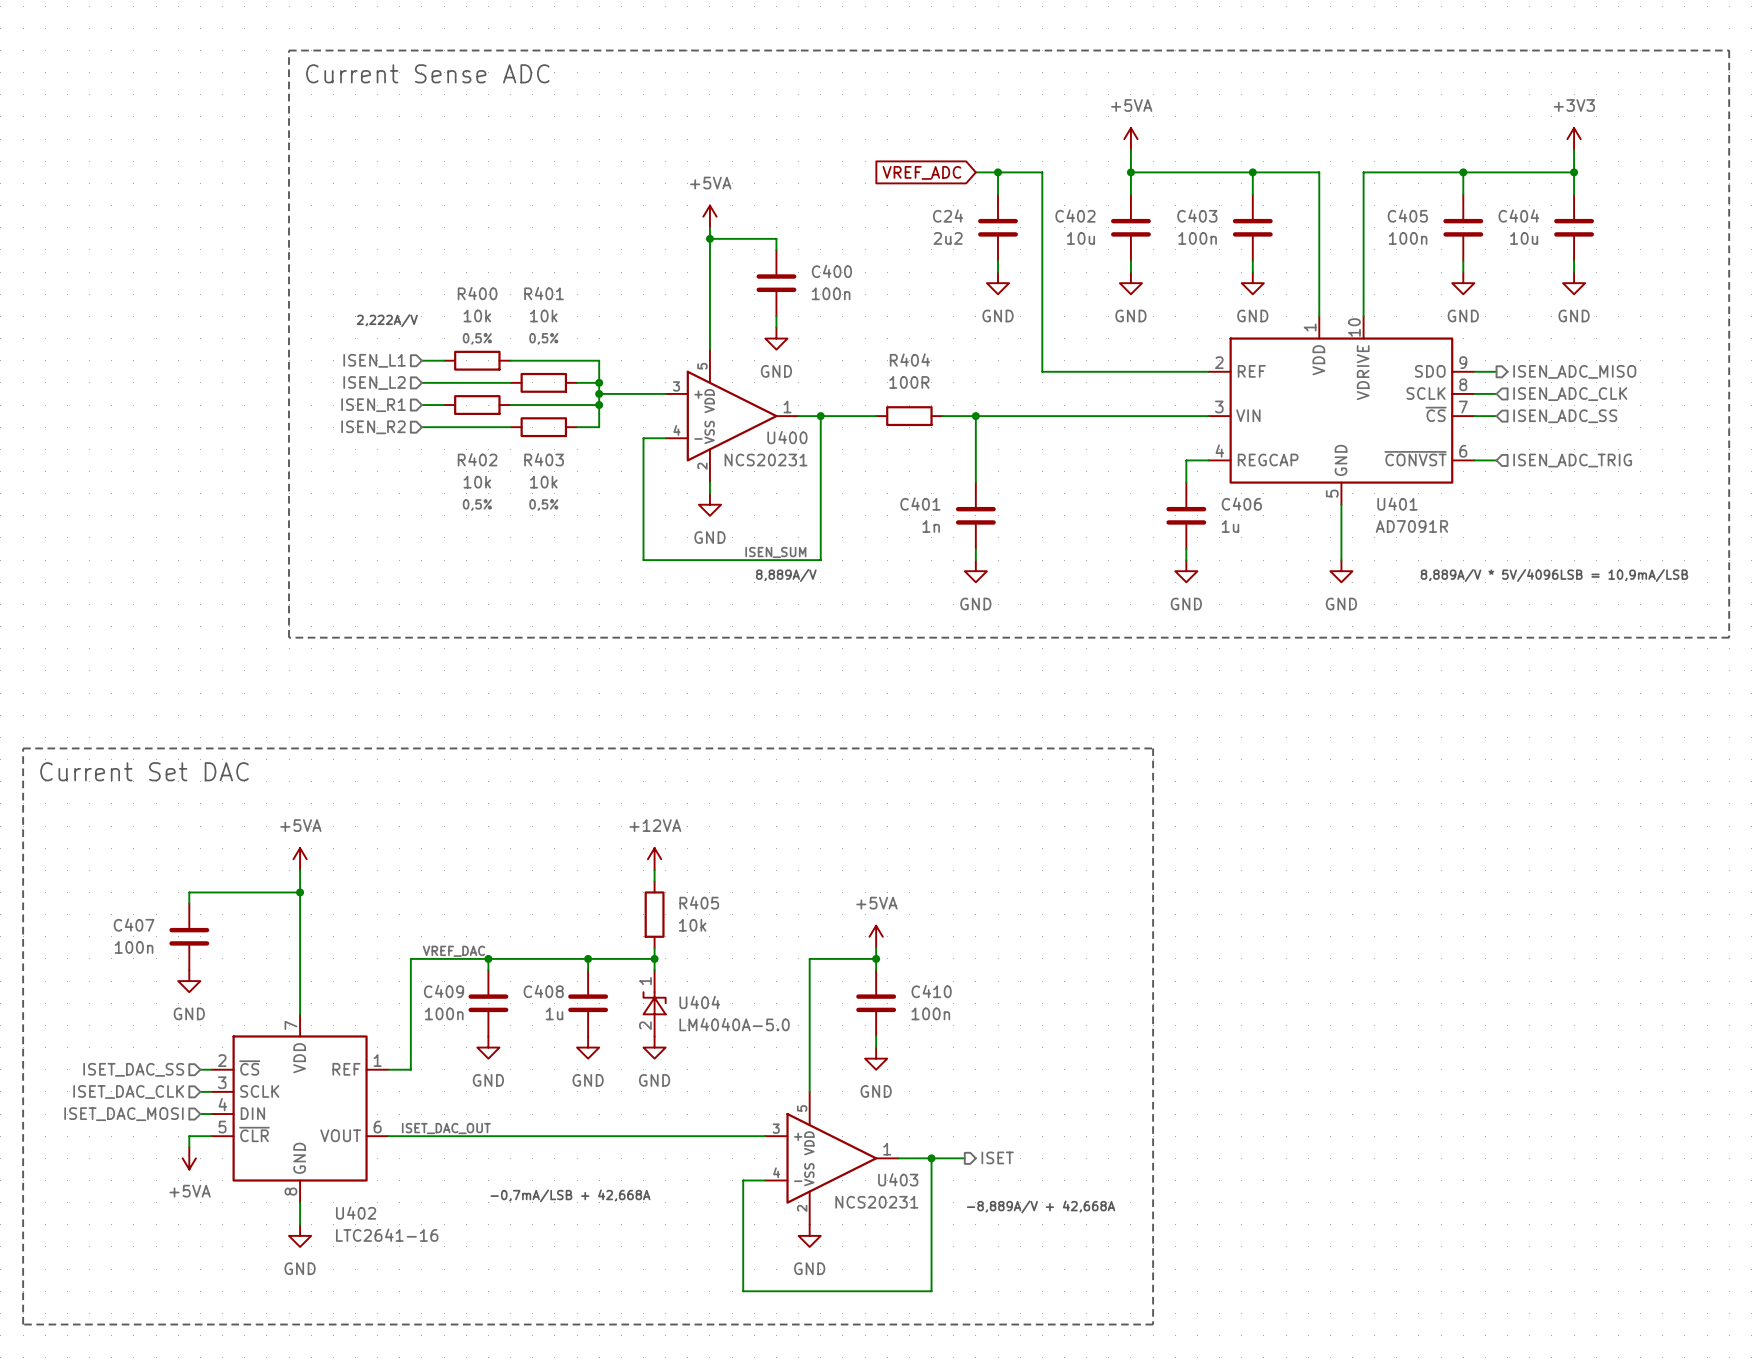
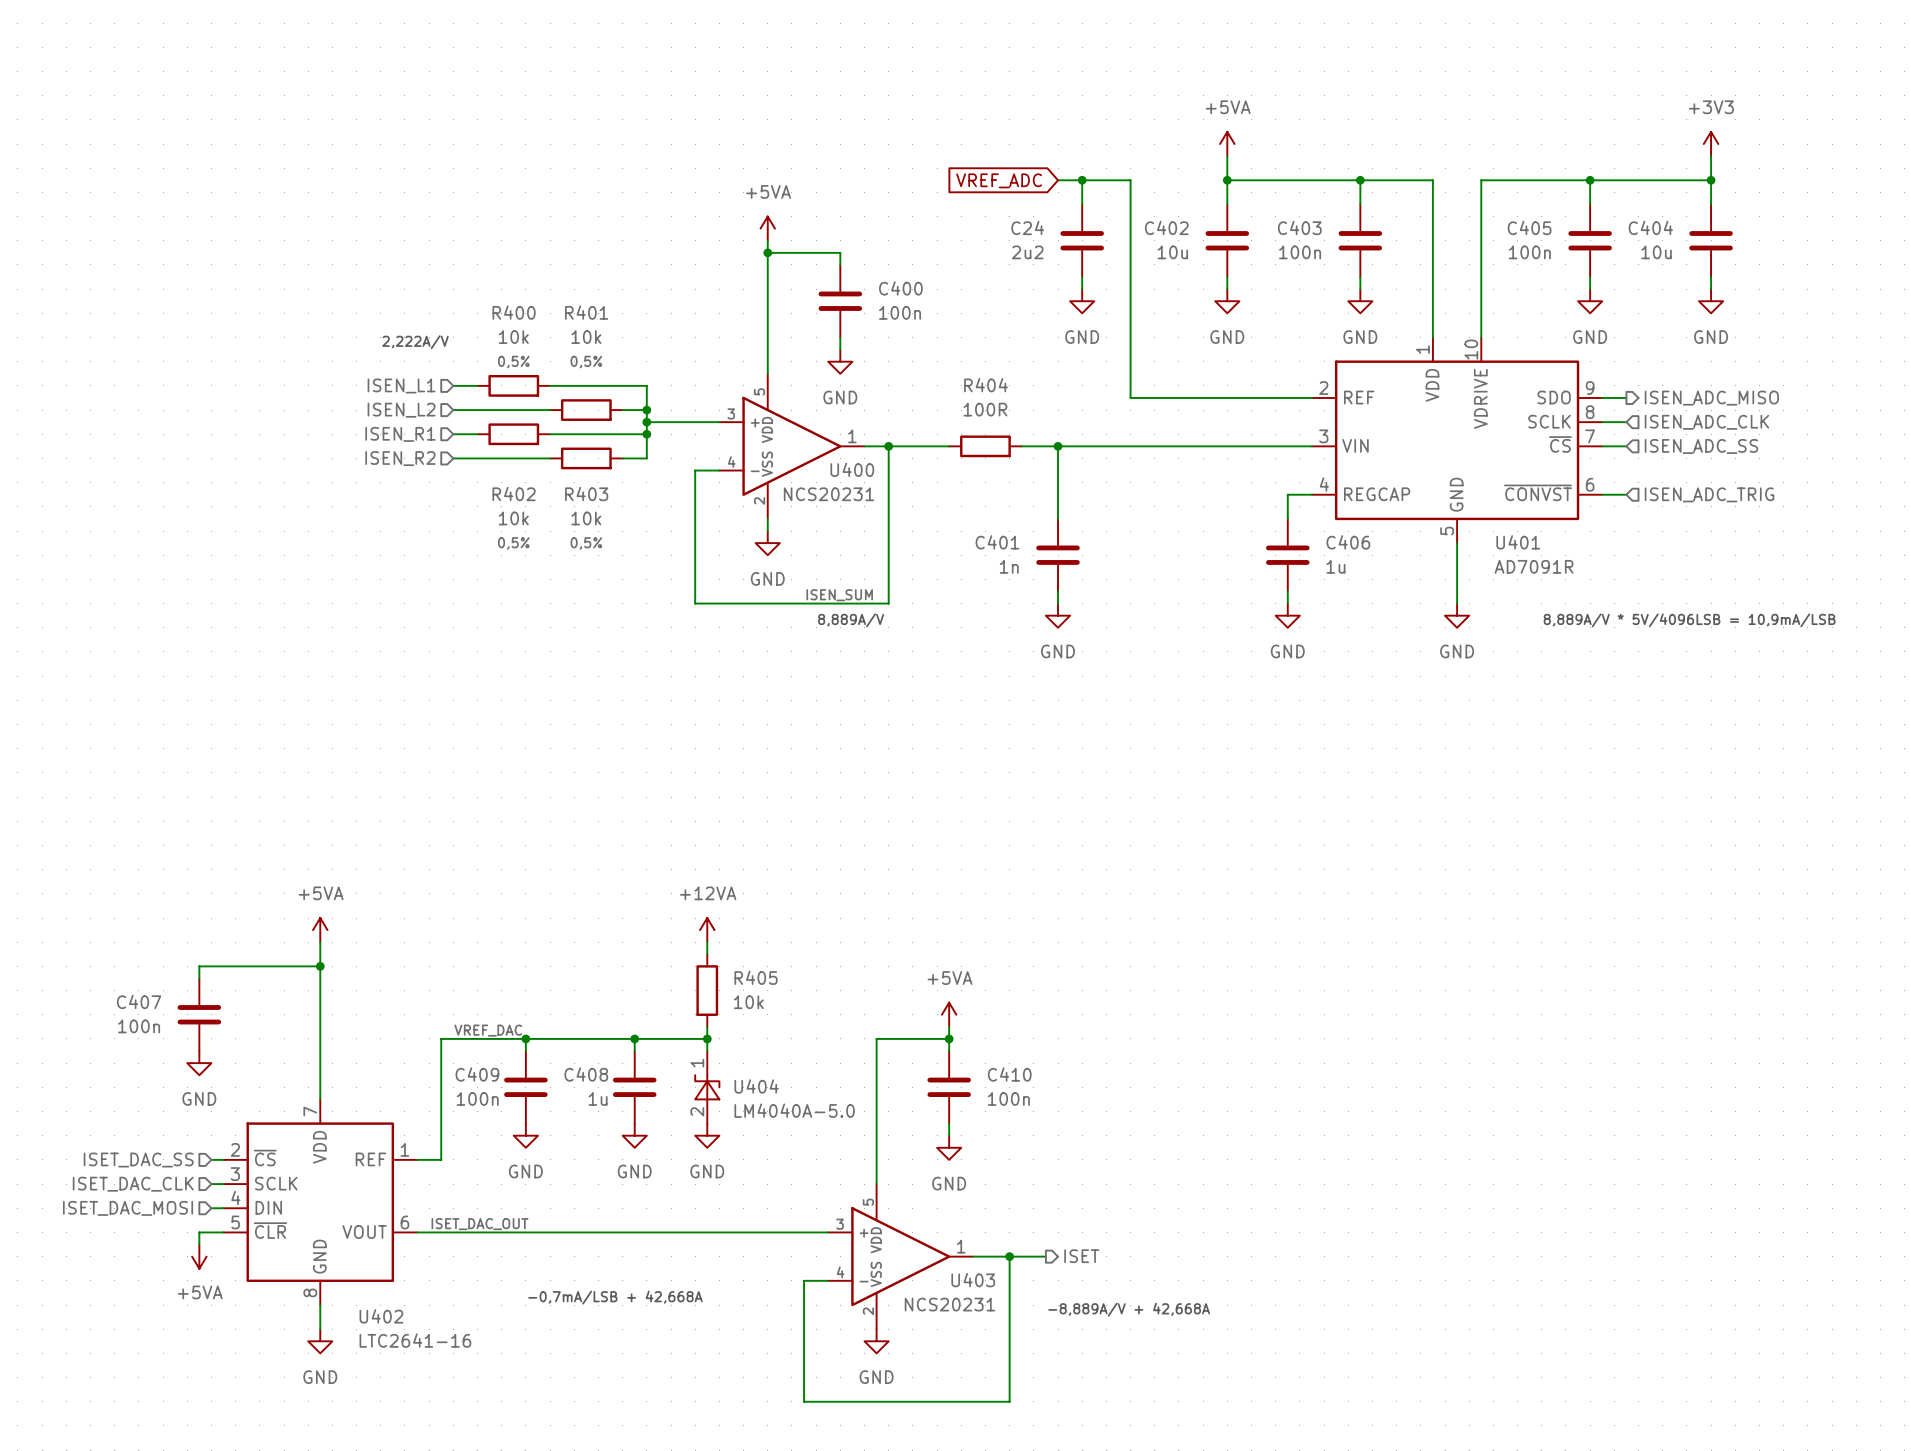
line: (289, 50) (1729, 50) (1729, 637) (289, 637) (289, 50) -> none
text: Current Sense ADC (427, 73) -> none
line: (23, 748) (1153, 748) (1153, 1324) (23, 1324) (23, 748) -> none
text: Current Set DAC (144, 771) -> none

